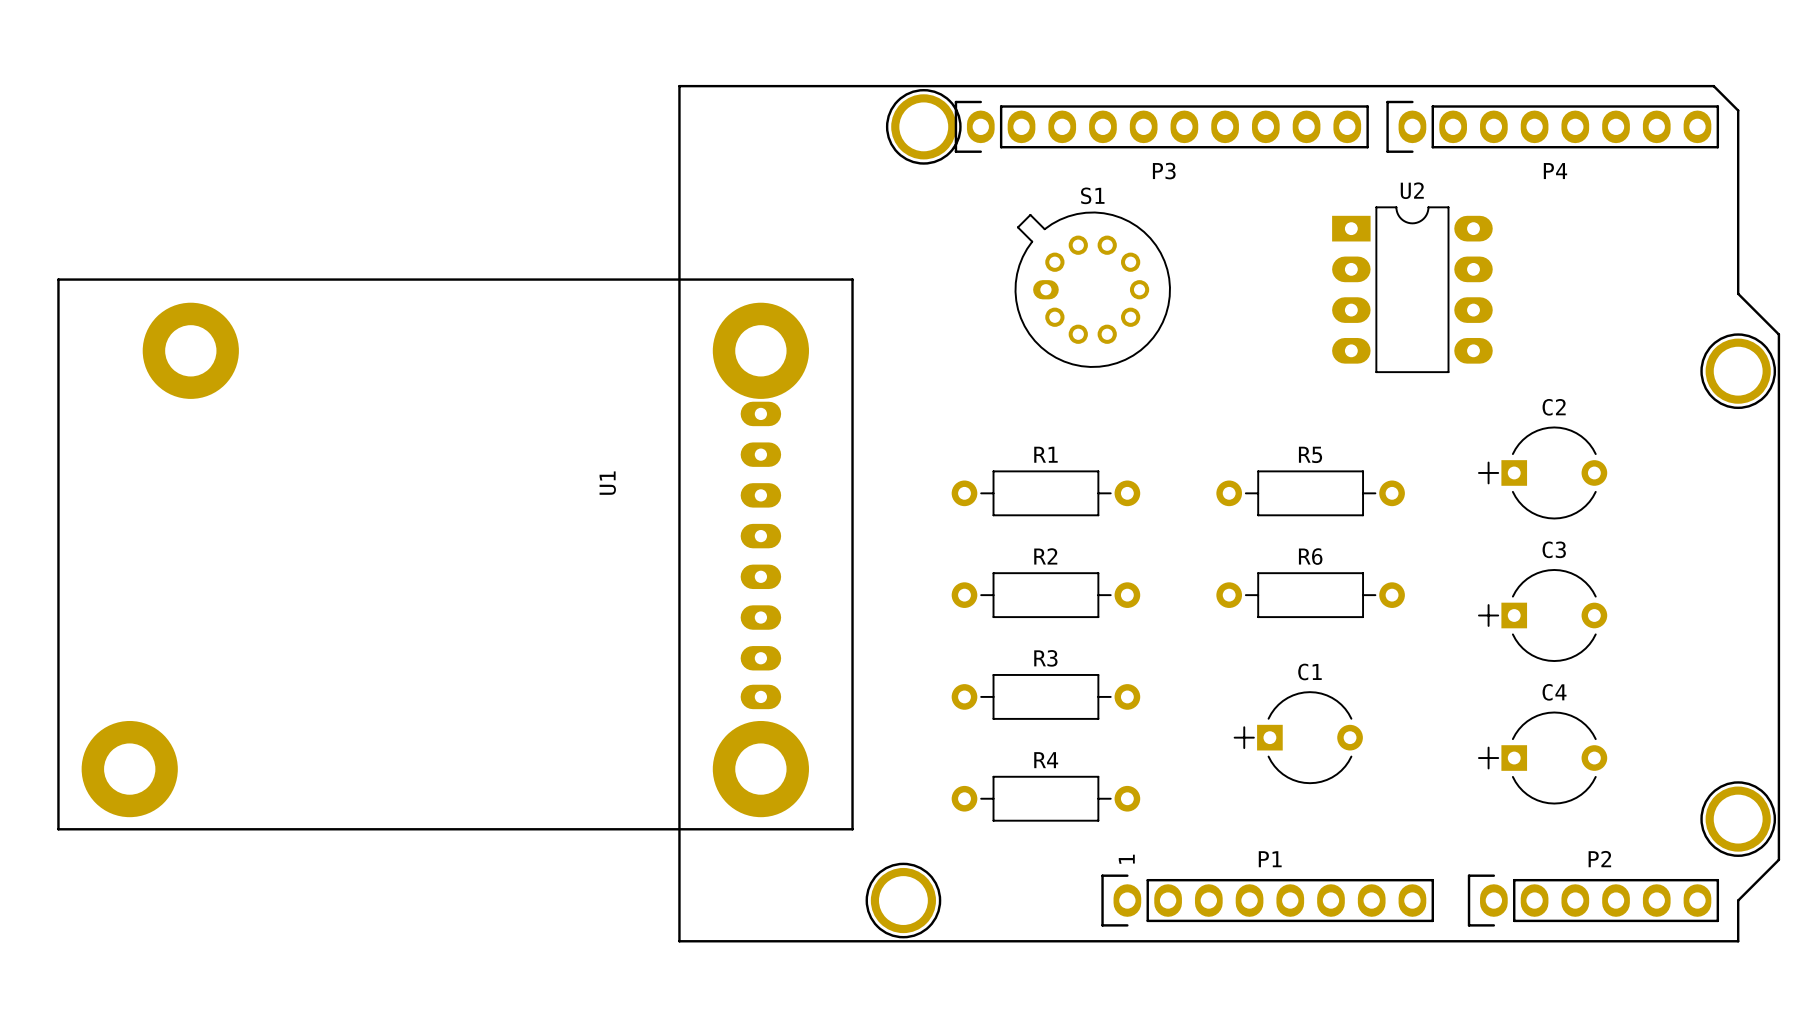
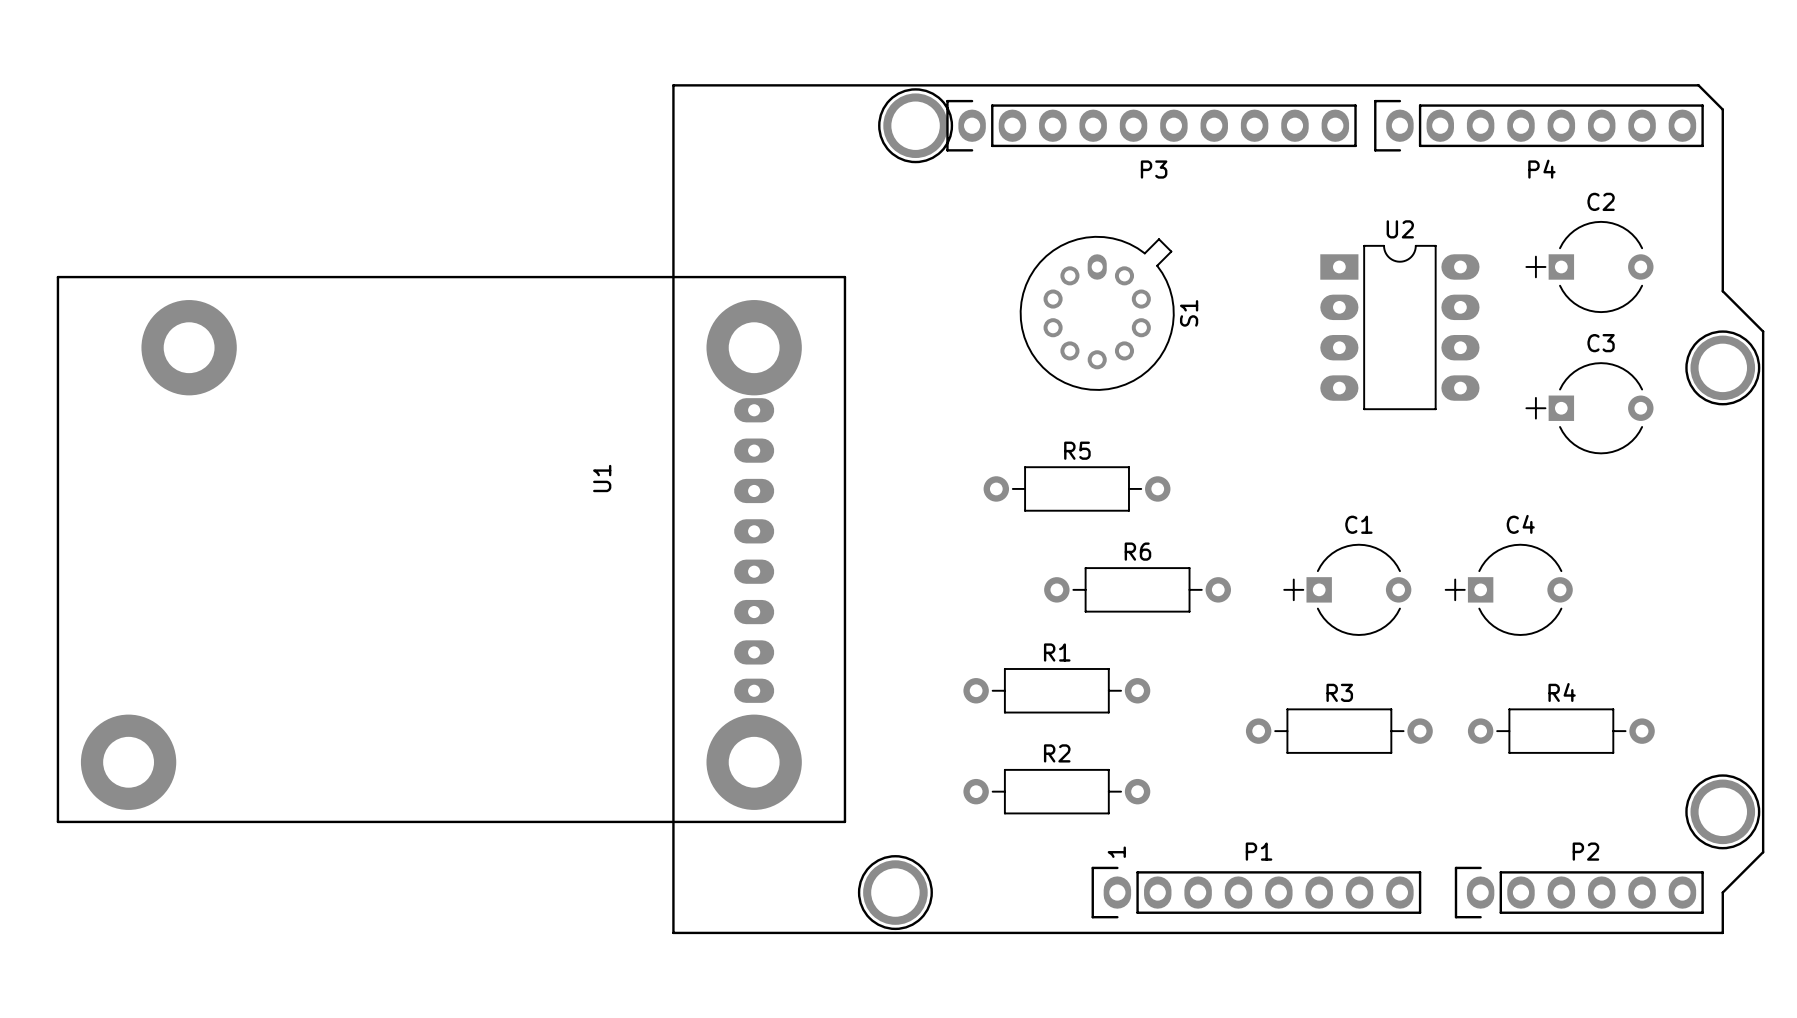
S1 rotation: 0° (1092, 289) -> 90° clockwise (1097, 313)
U2 position: (1412, 289) -> (1399, 327)
C2 position: (1542, 472) -> (1589, 266)
R1 position: (1045, 493) -> (1056, 690)
R5 position: (1310, 493) -> (1077, 488)
R2 position: (1045, 595) -> (1056, 791)
R6 position: (1310, 595) -> (1137, 589)
C3 position: (1542, 615) -> (1589, 408)
R3 position: (1045, 696) -> (1339, 731)
C1 position: (1298, 737) -> (1347, 589)
C4 position: (1542, 758) -> (1508, 589)
R4 position: (1045, 798) -> (1561, 731)

